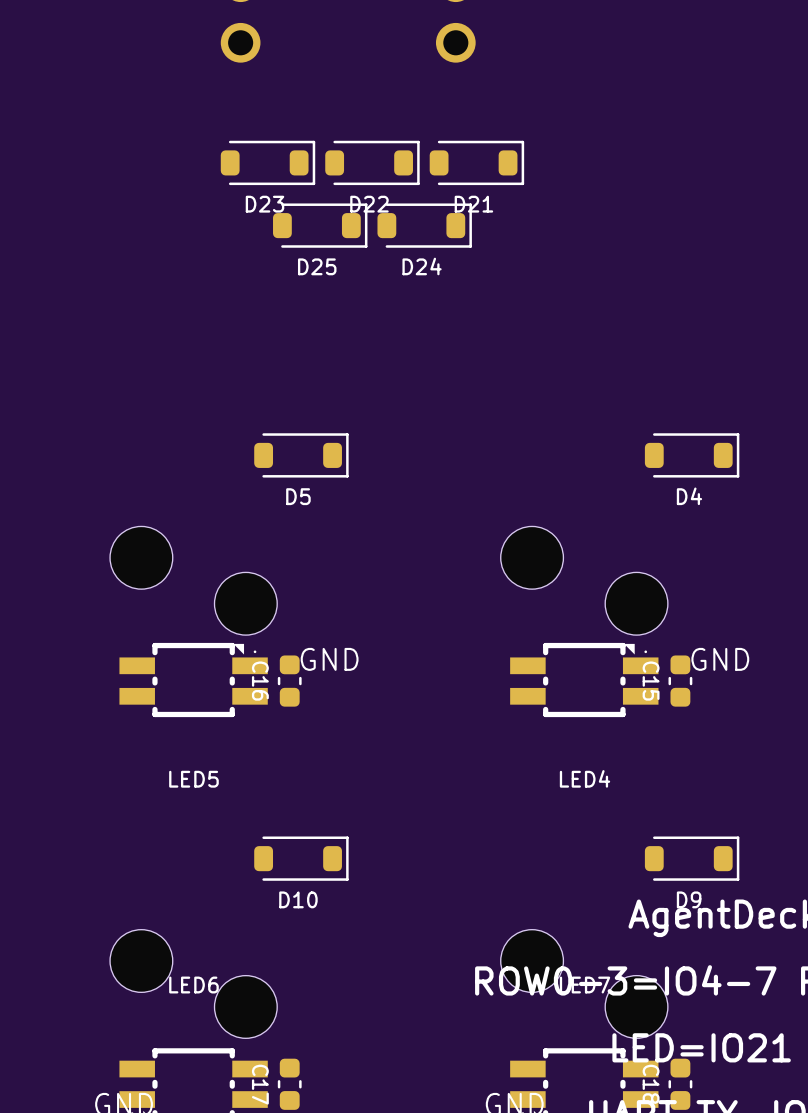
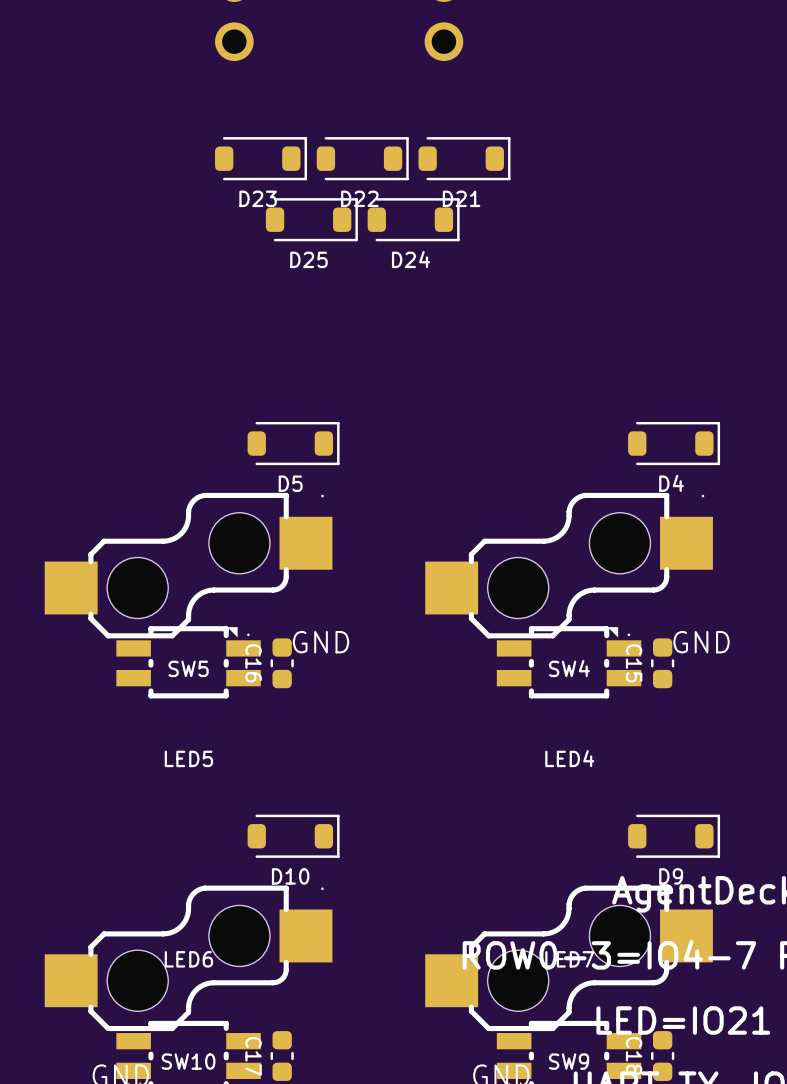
part: (193, 580) -> none
SW5: none -> (188, 565)
part: (584, 580) -> none
SW4: none -> (569, 565)
part: (193, 983) -> none
SW10: none -> (188, 958)
part: (584, 983) -> none
SW9: none -> (569, 958)

